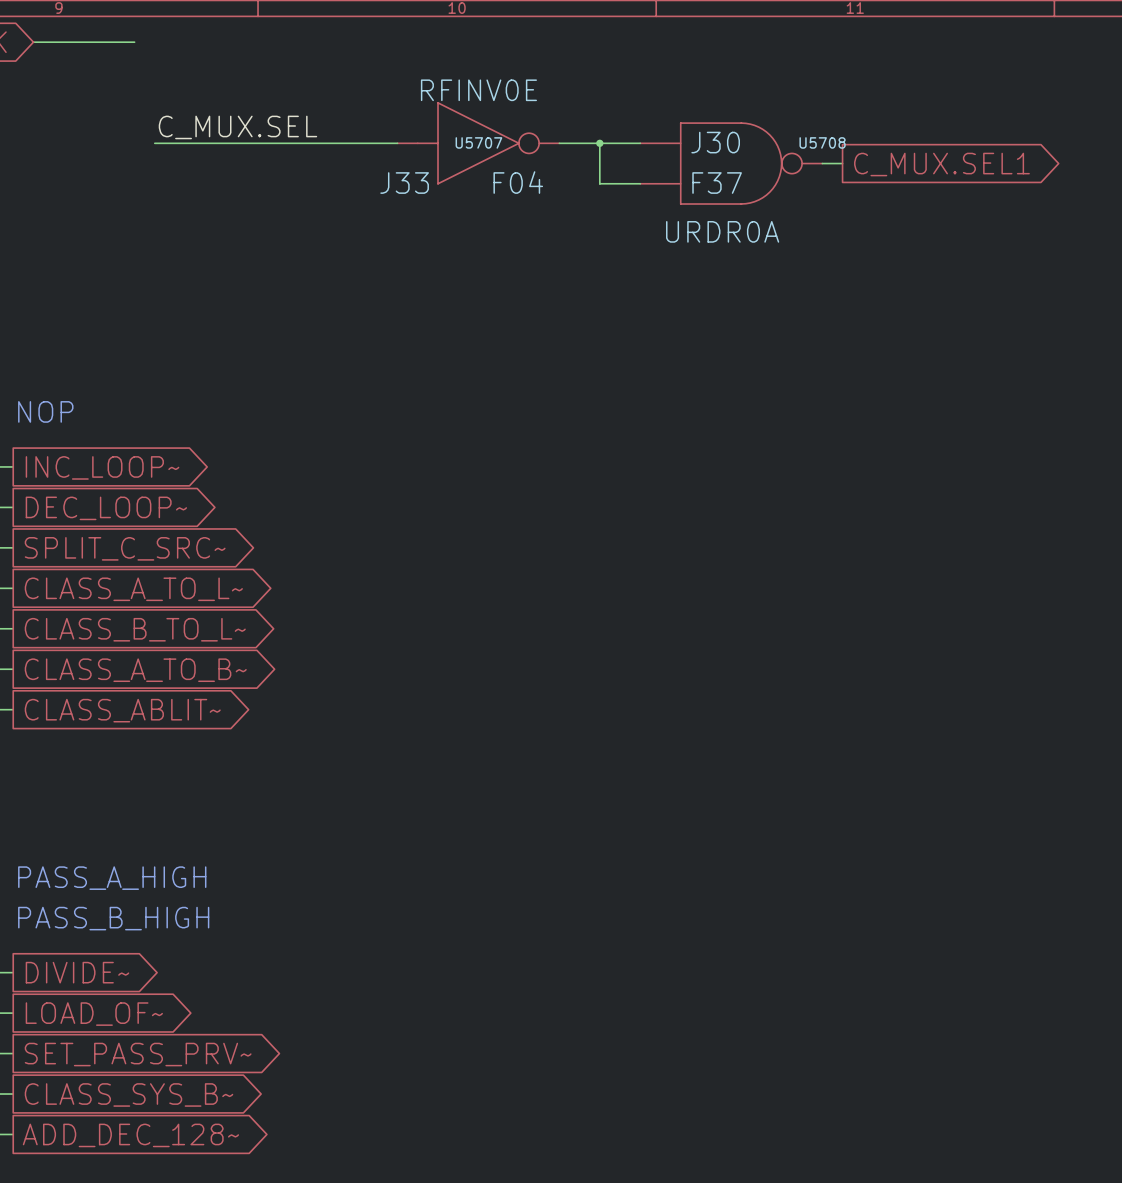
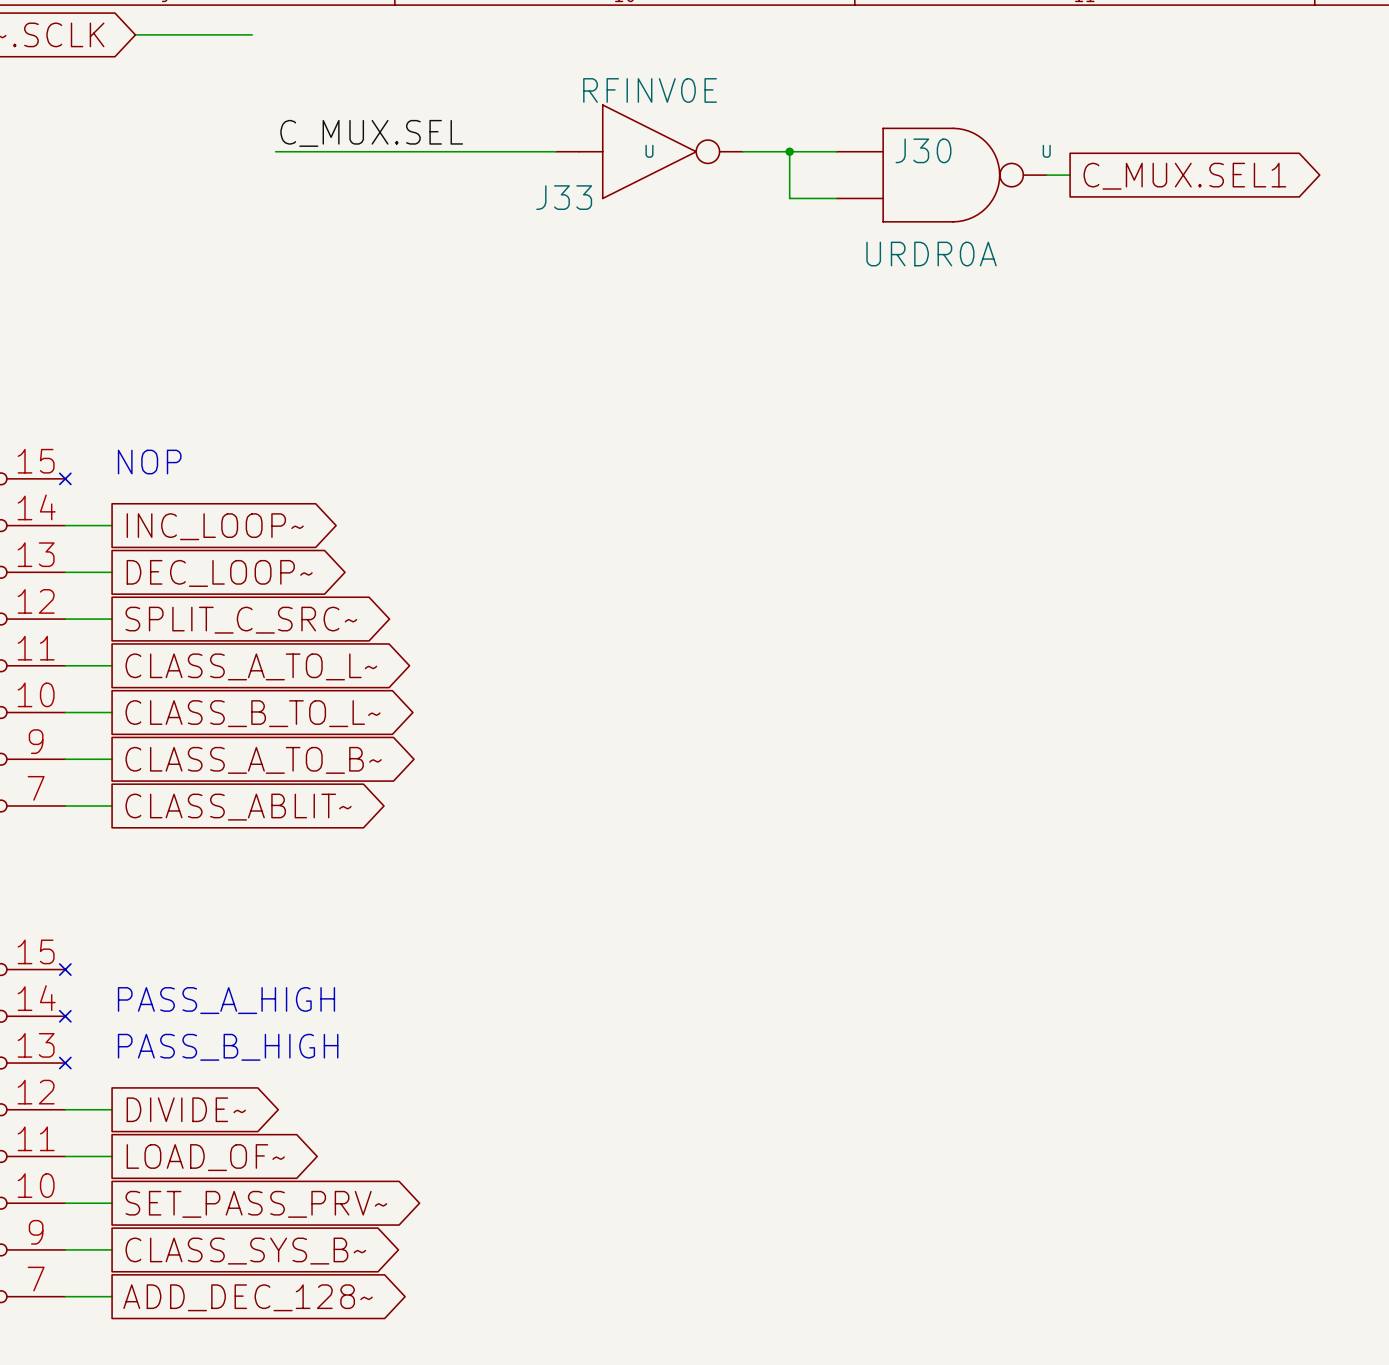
U5707 name: U5707 (478, 142) -> U (649, 151)
U5708 name: U5708 (822, 142) -> U (1046, 151)
U5707 value: F04 (518, 182) -> none
U5708 value: F37 (717, 183) -> none

